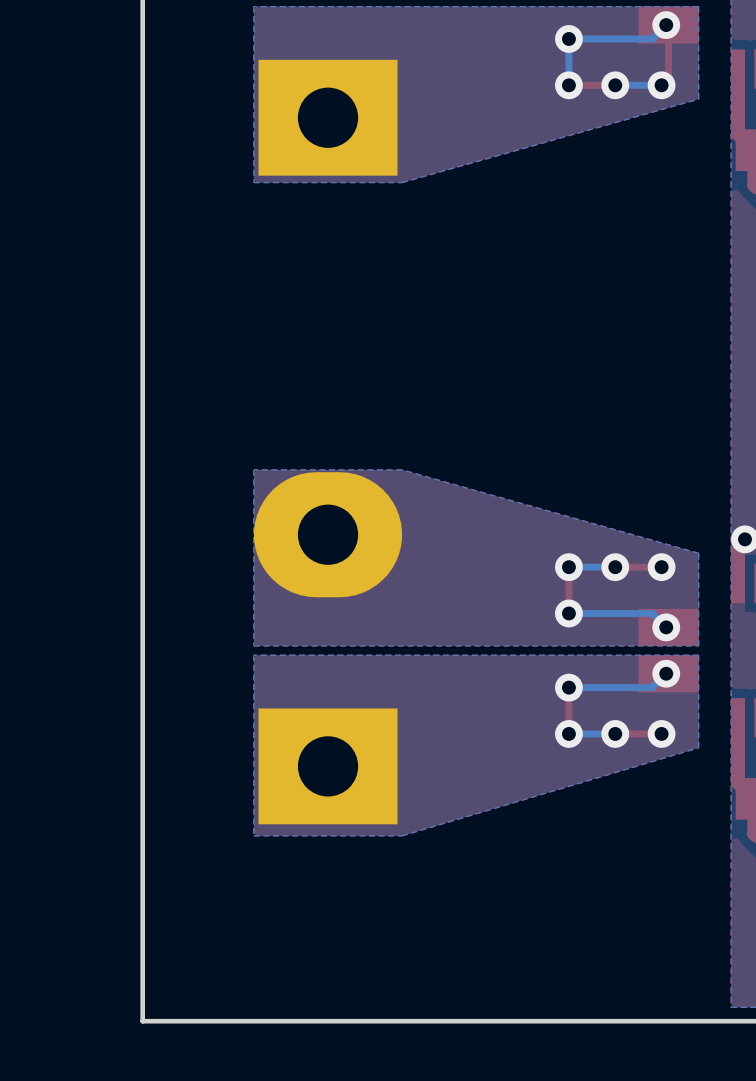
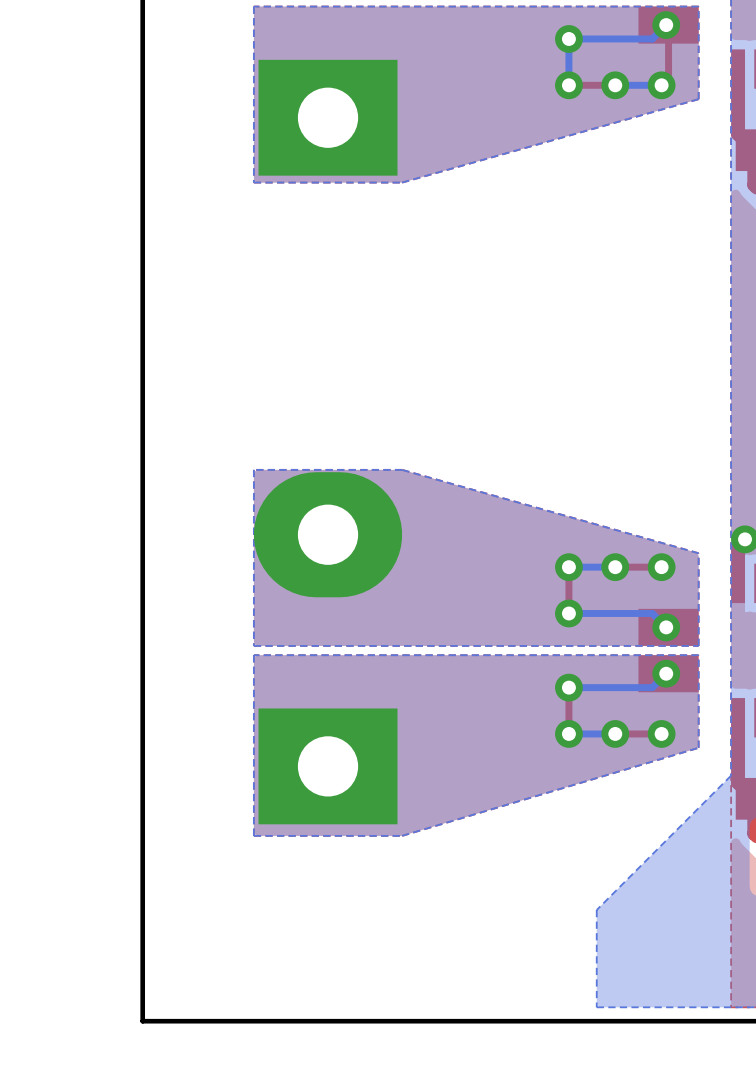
bottom zone outline: (731, 775) (731, 1007) -> (731, 775) (596, 910) (596, 1007) (731, 1007)

